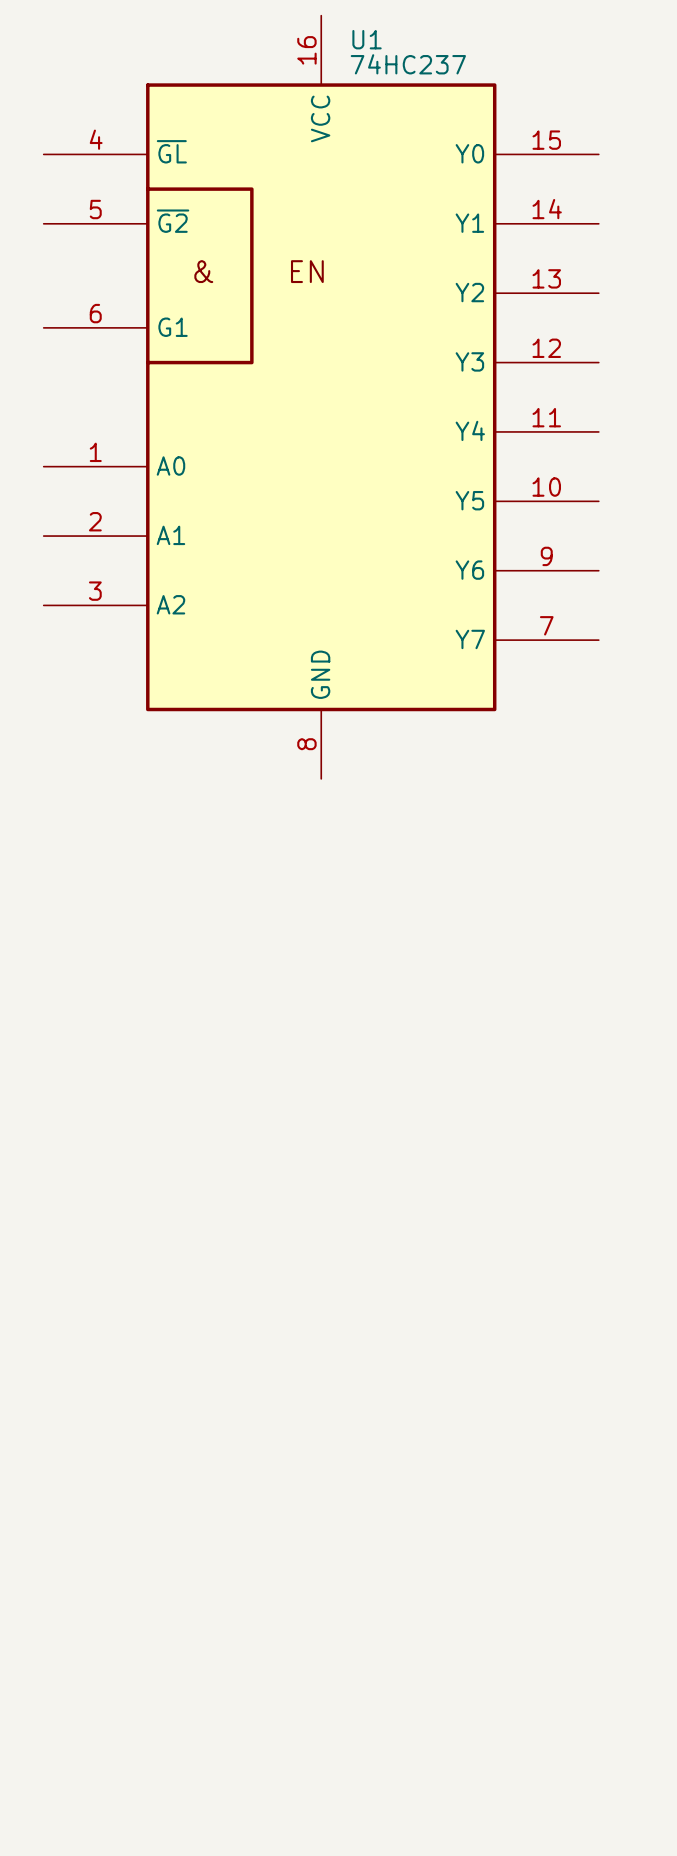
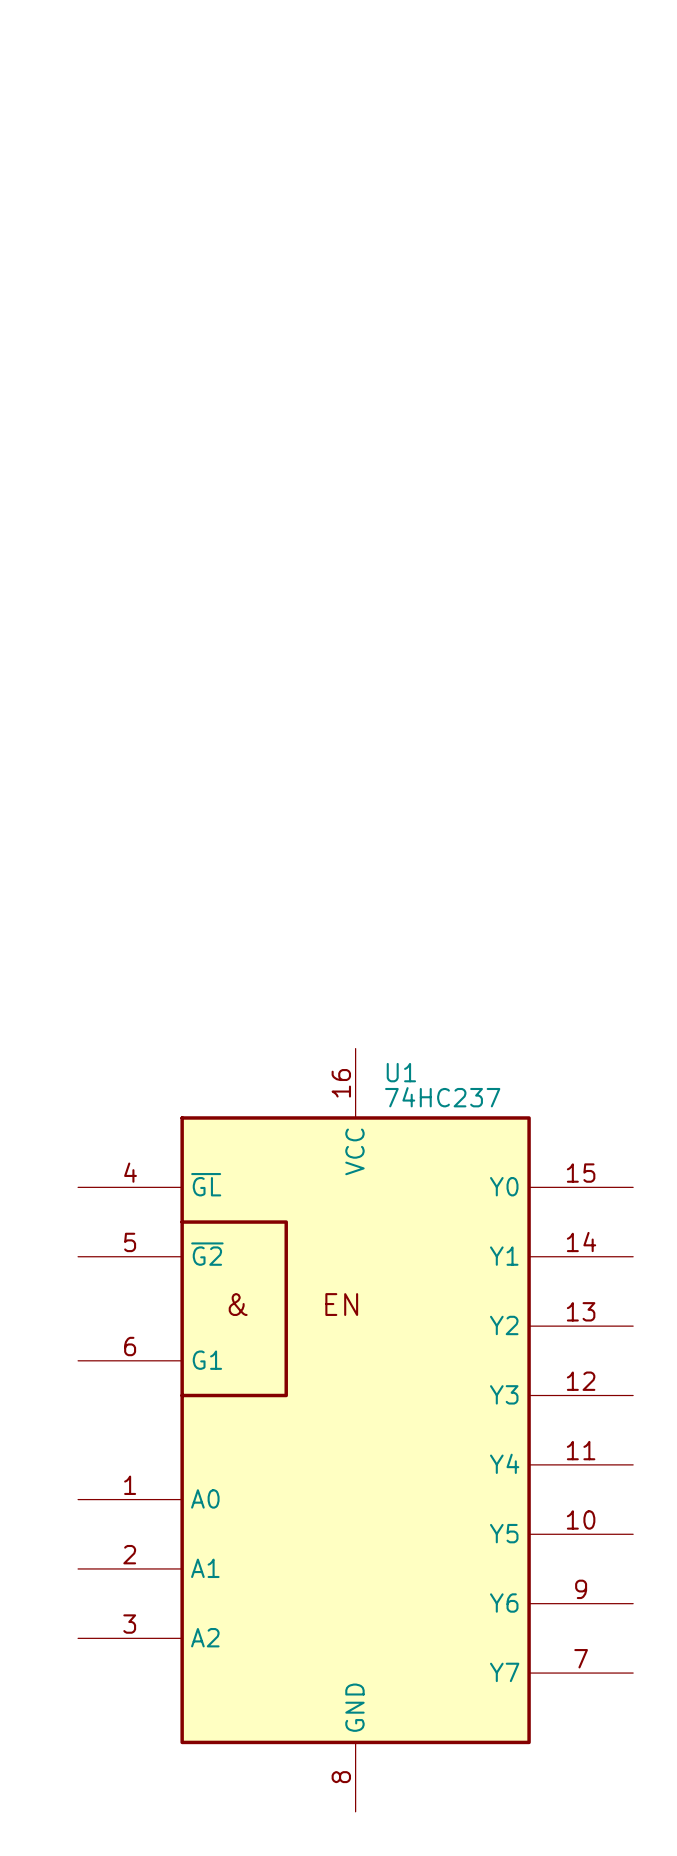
U1 symbol: [43, 15, 599, 779] -> [78, 1048, 634, 1812]

